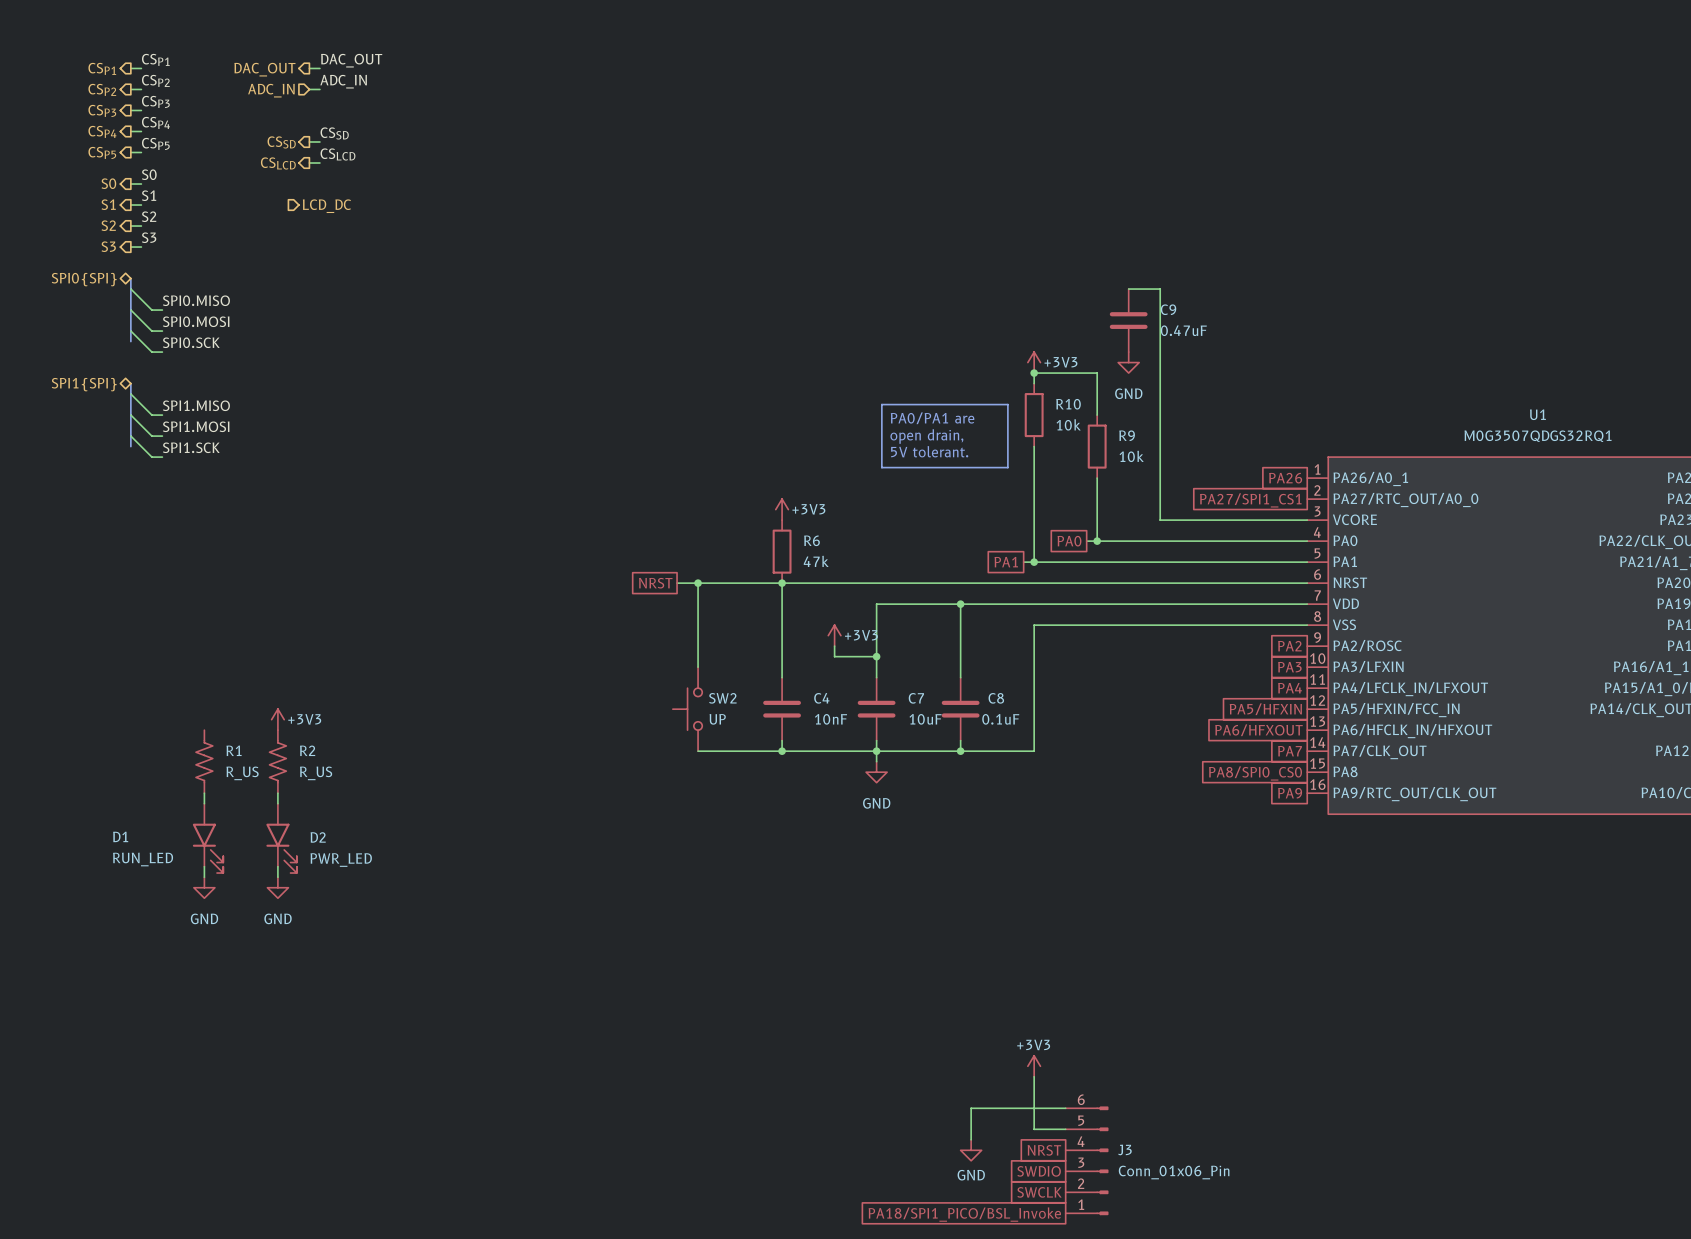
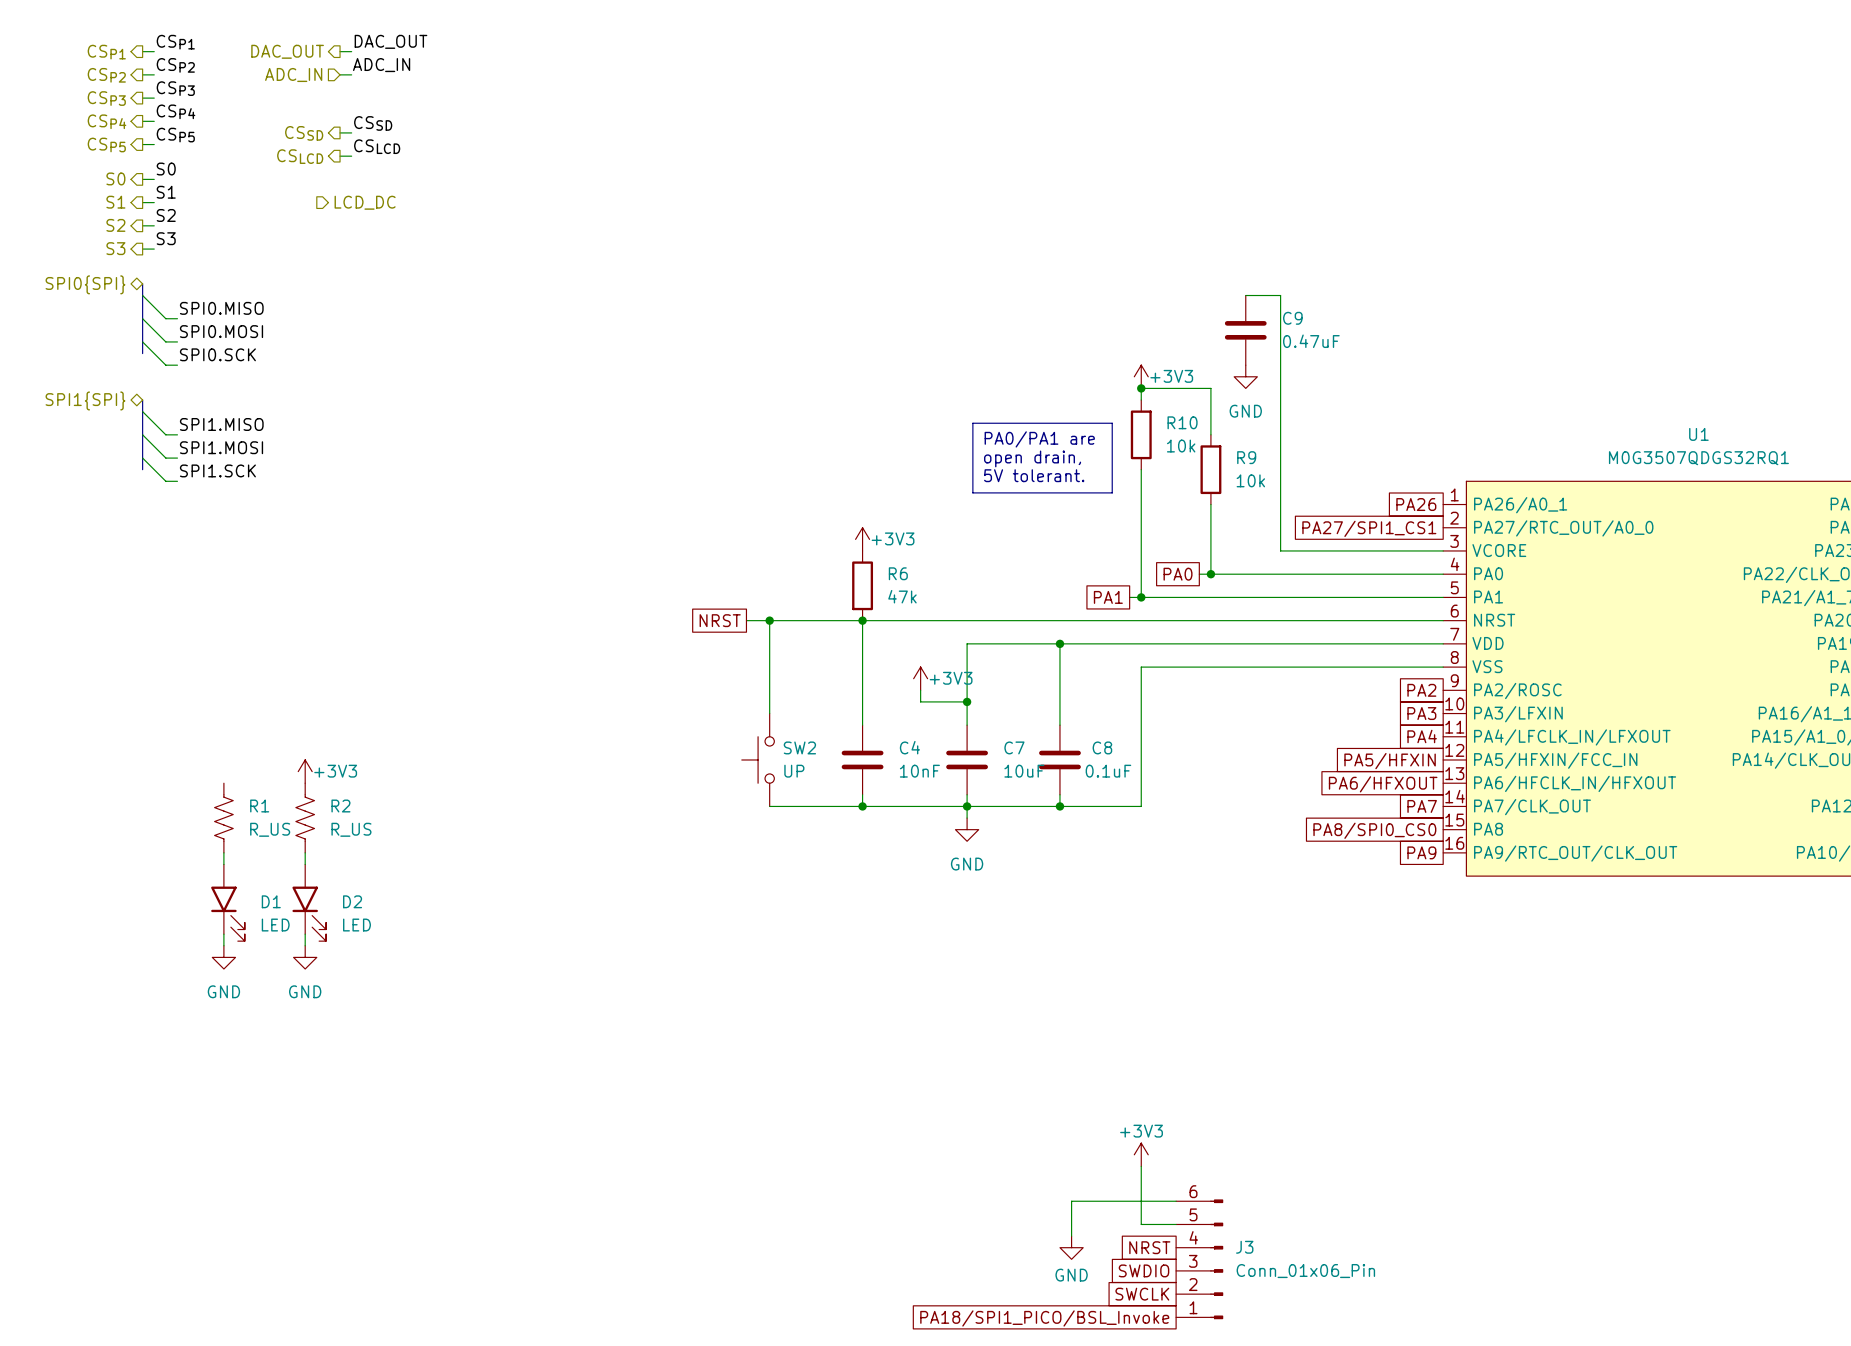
D1 name position: D1 (120, 836) -> D1 (271, 901)
D1 value: RUN_LED (143, 859) -> LED (275, 925)
D2 value: PWR_LED (341, 860) -> LED (356, 925)

